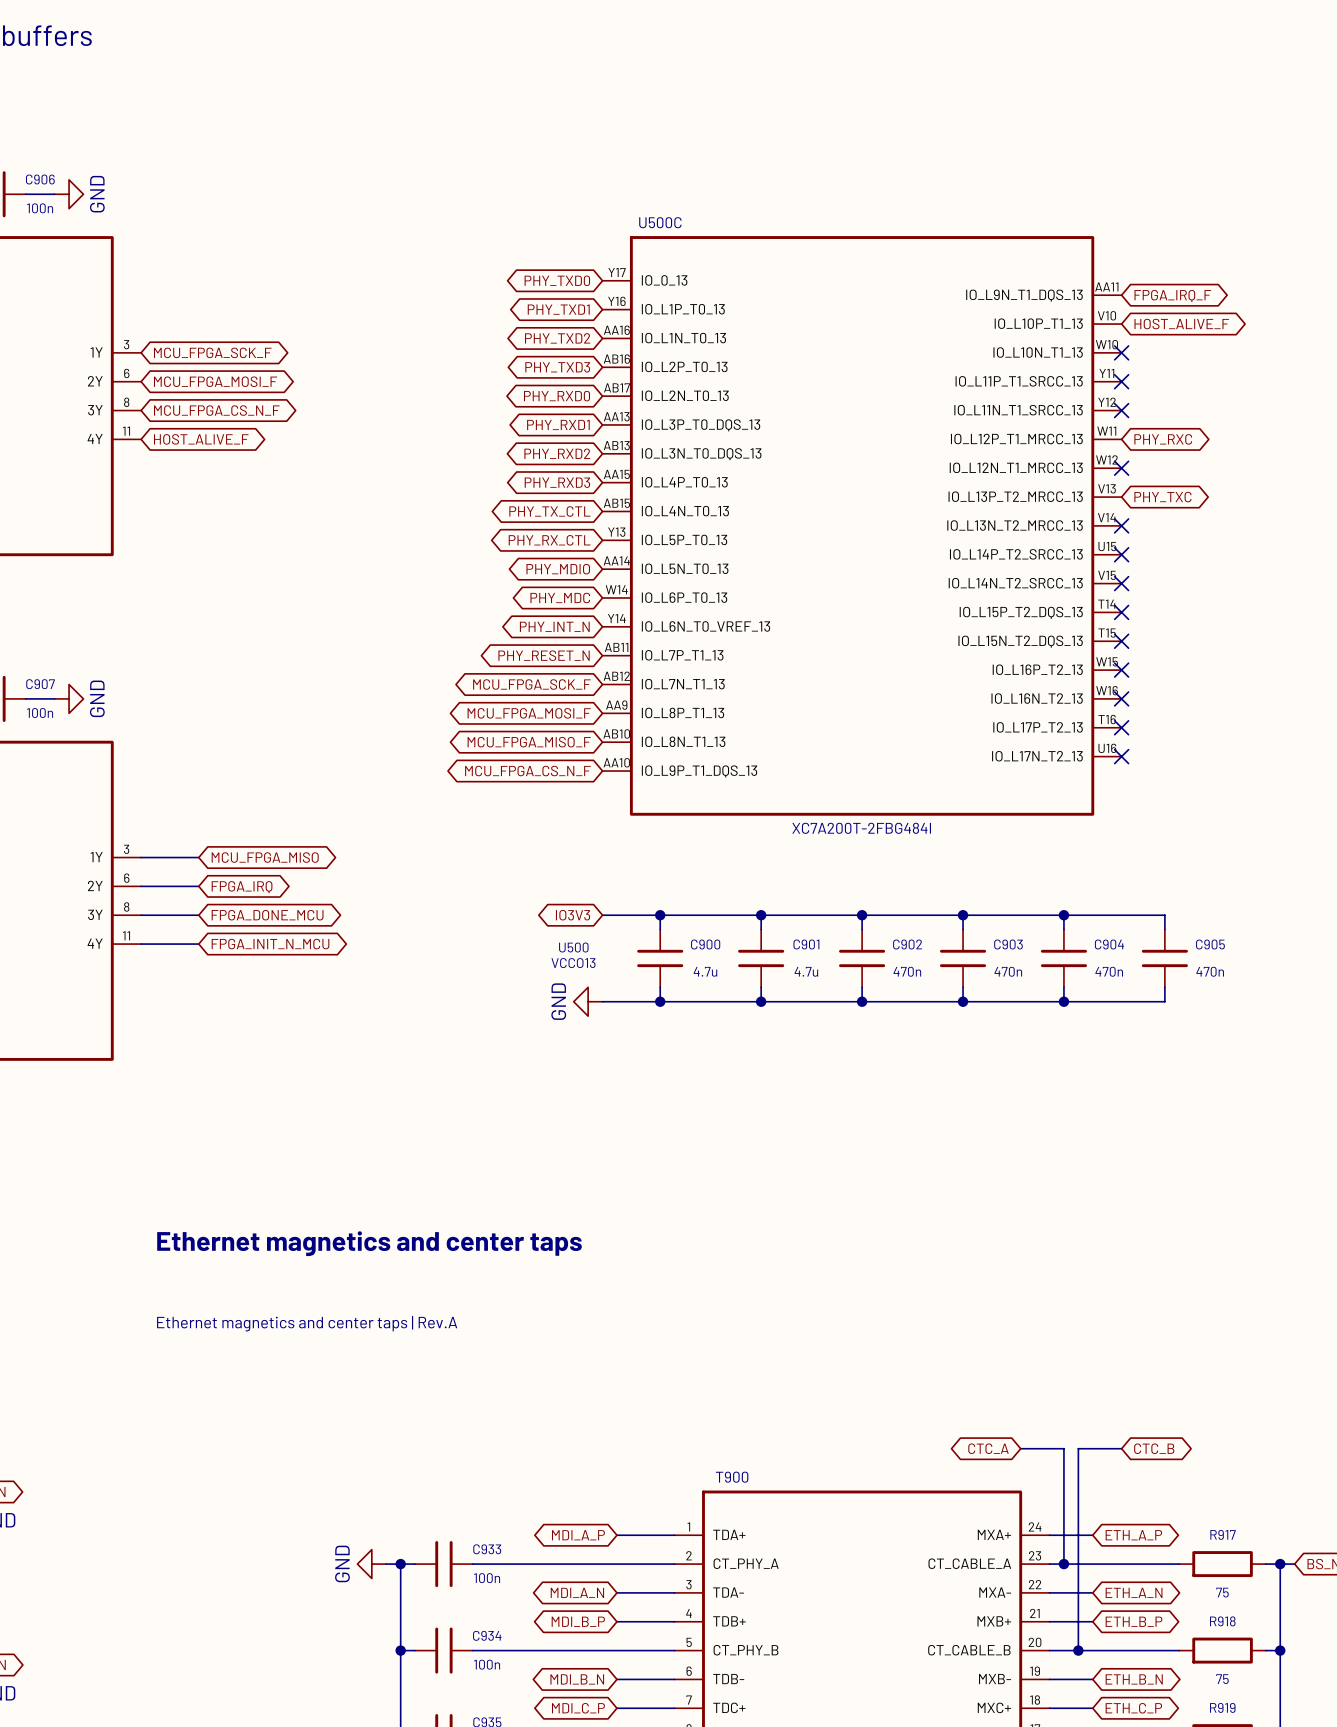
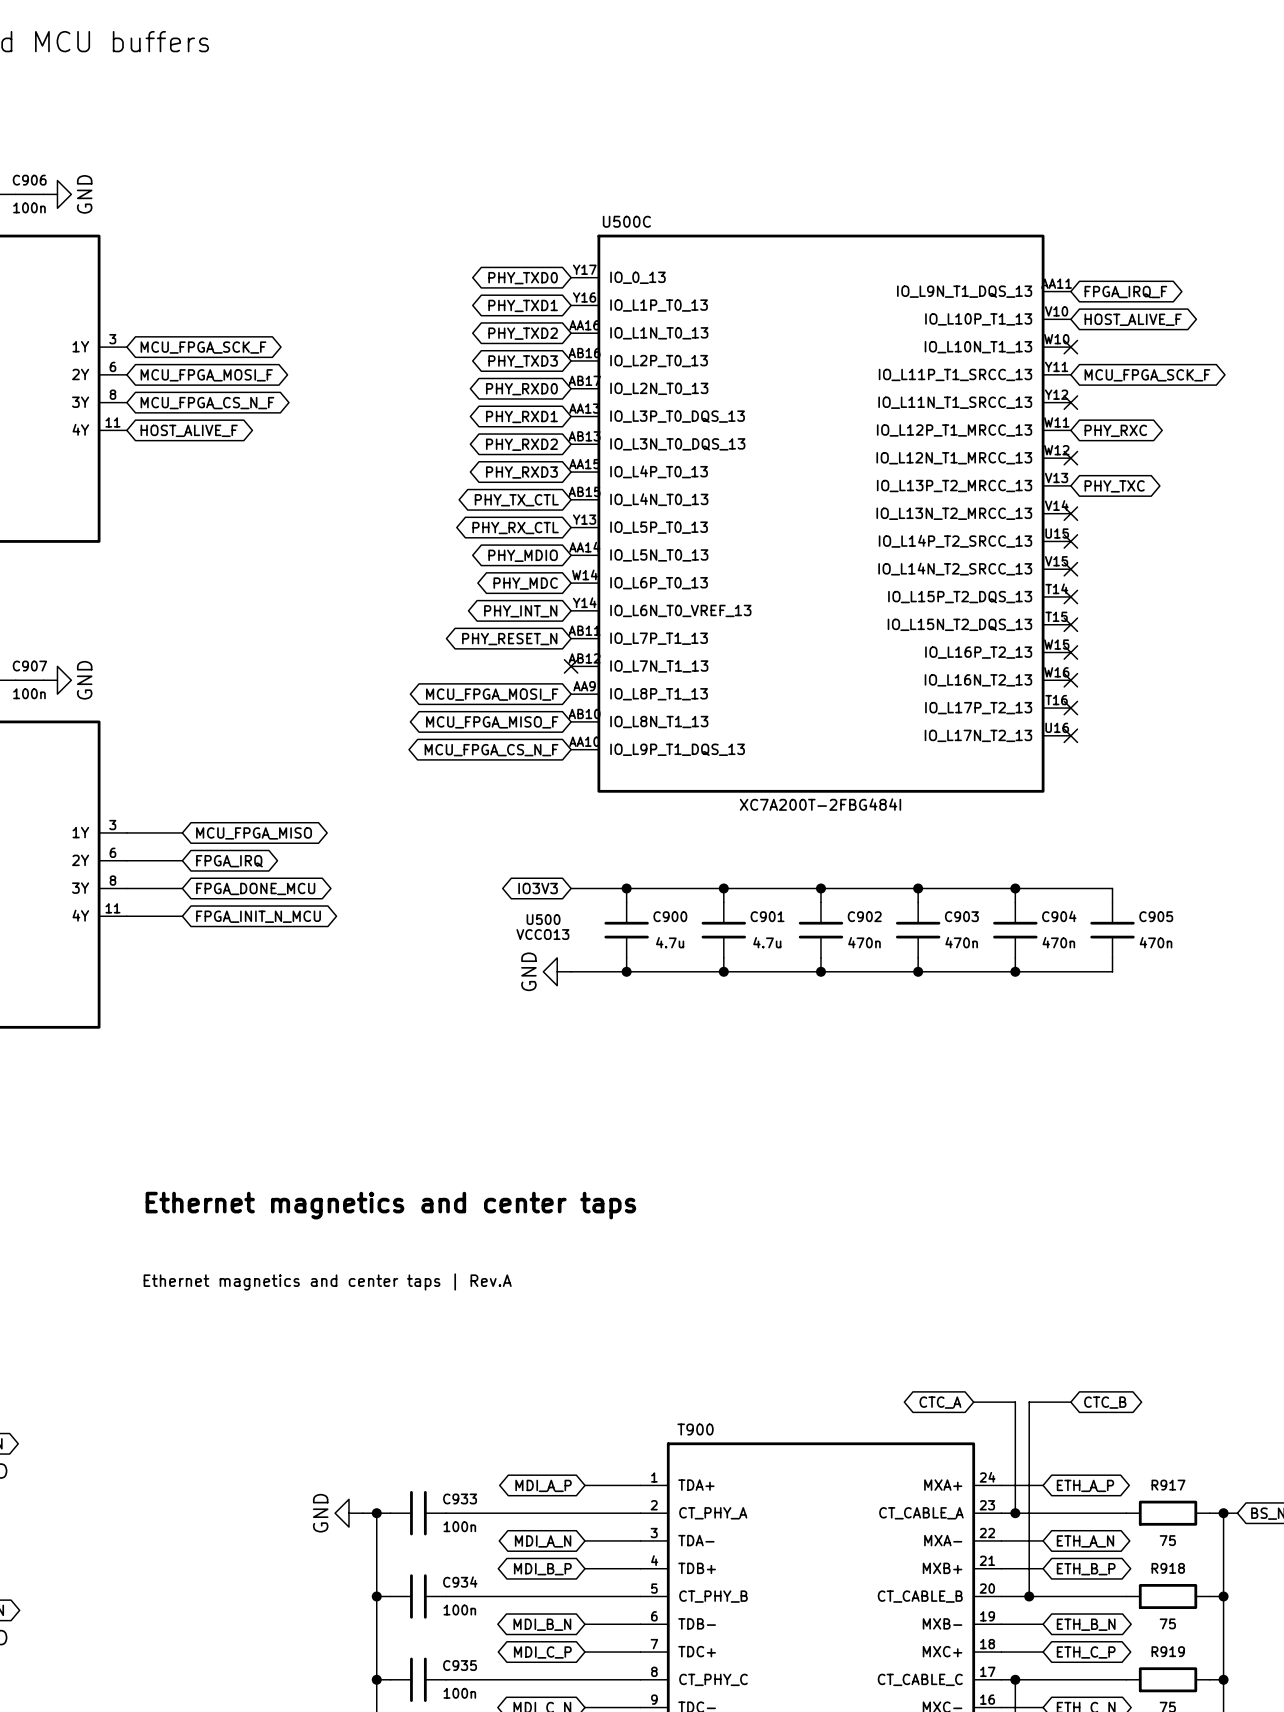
no-connect mark: (1121, 381) -> none
global label: none -> MCU_FPGA_SCK_F (1147, 375)
global label: MCU_FPGA_SCK_F (531, 684) -> none
no-connect mark: none -> (571, 666)

